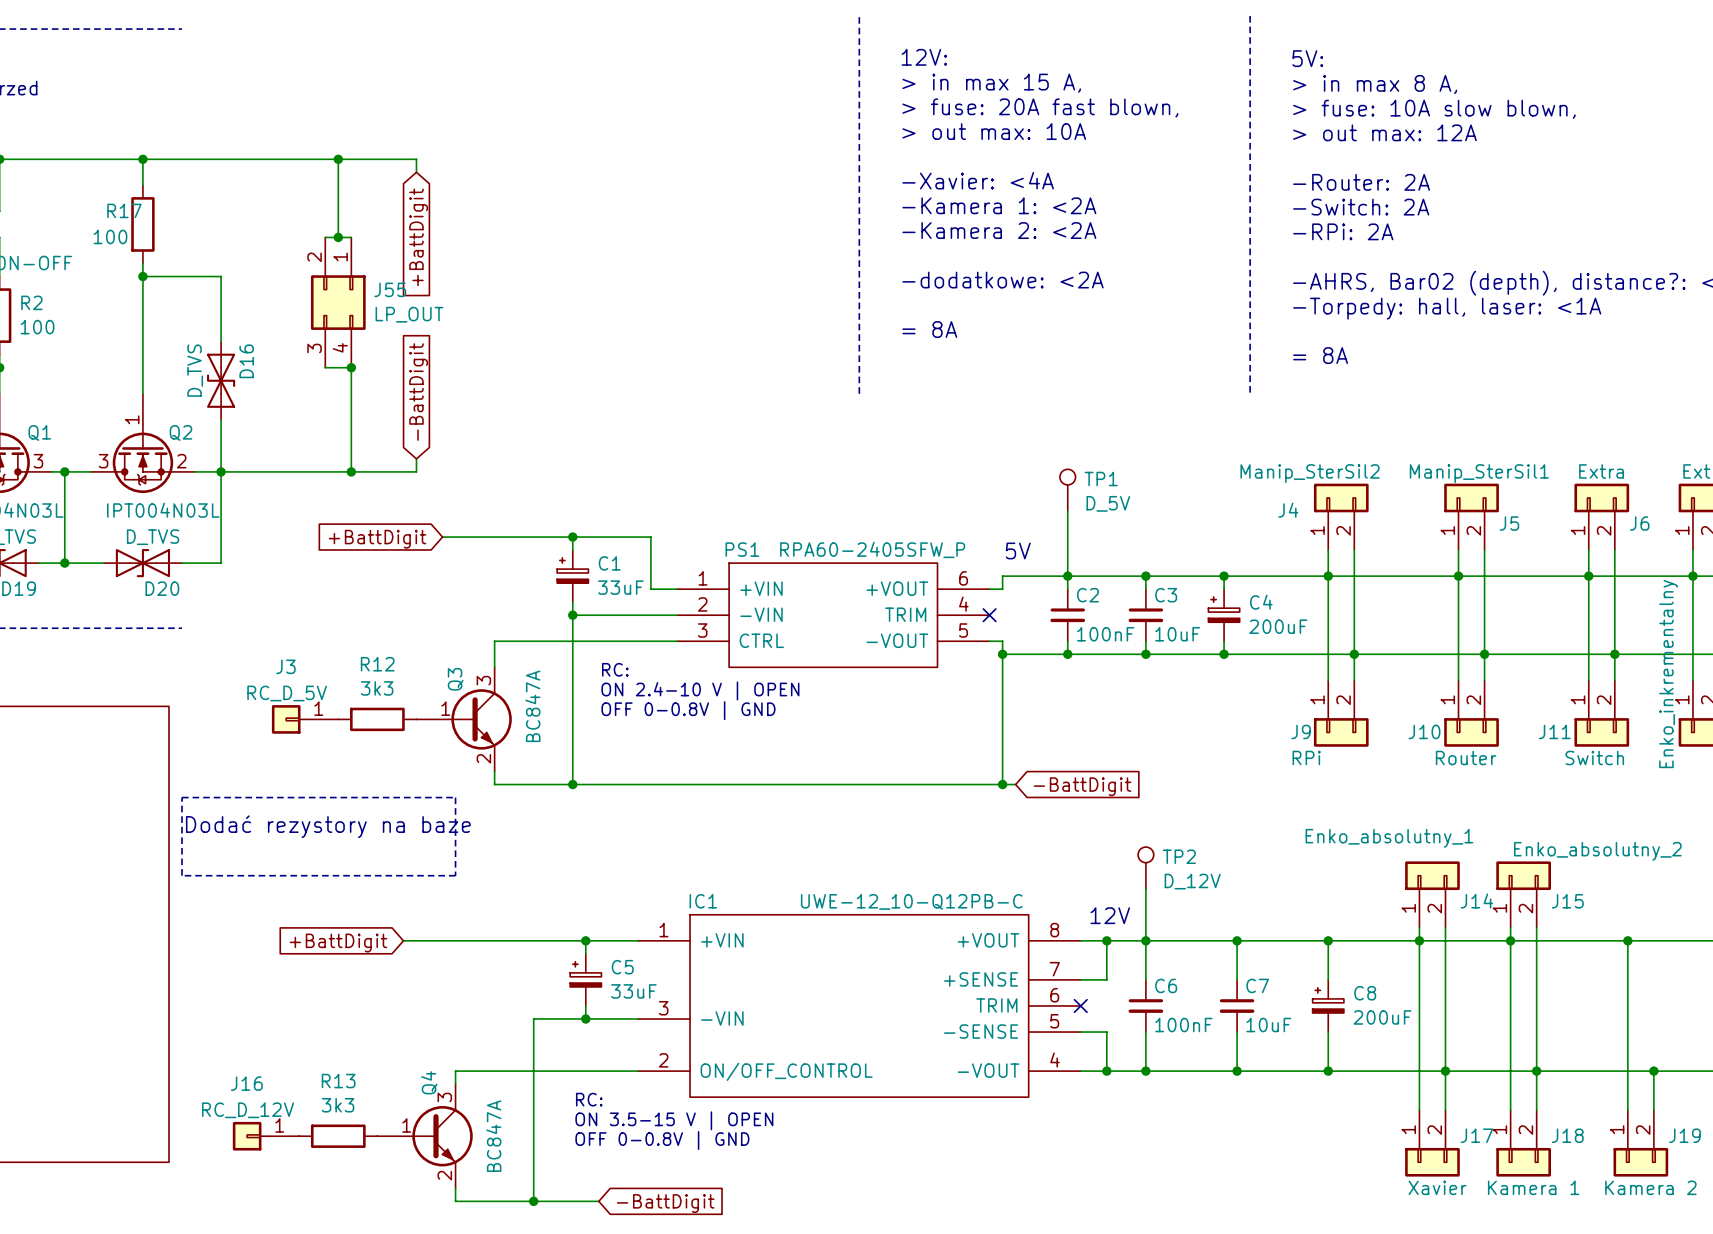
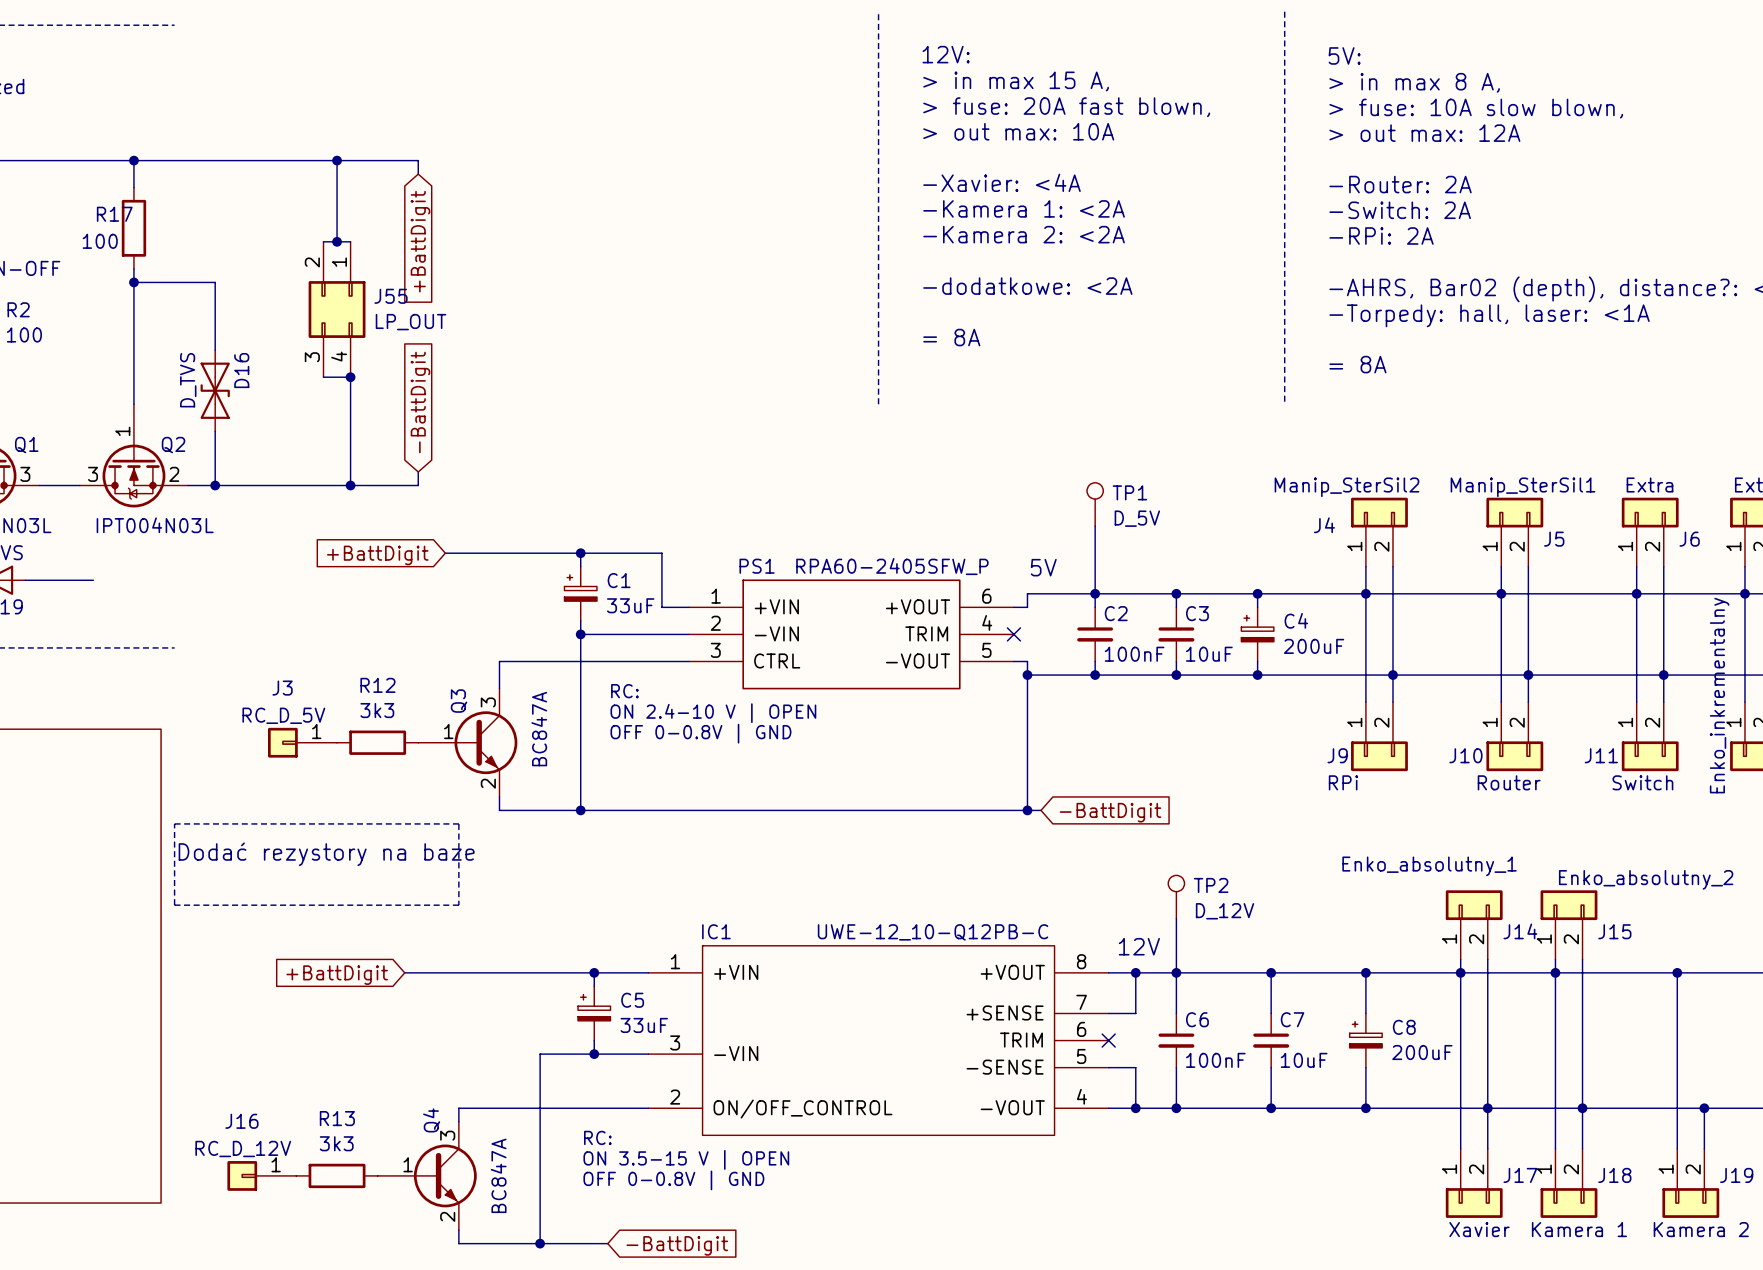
wire: (64, 471) (64, 563) -> none
junction: (64, 471) -> none
wire: (221, 471) (221, 563) (182, 563) -> none
junction: (64, 563) -> none
D20: D_TVS (142, 563) -> none

